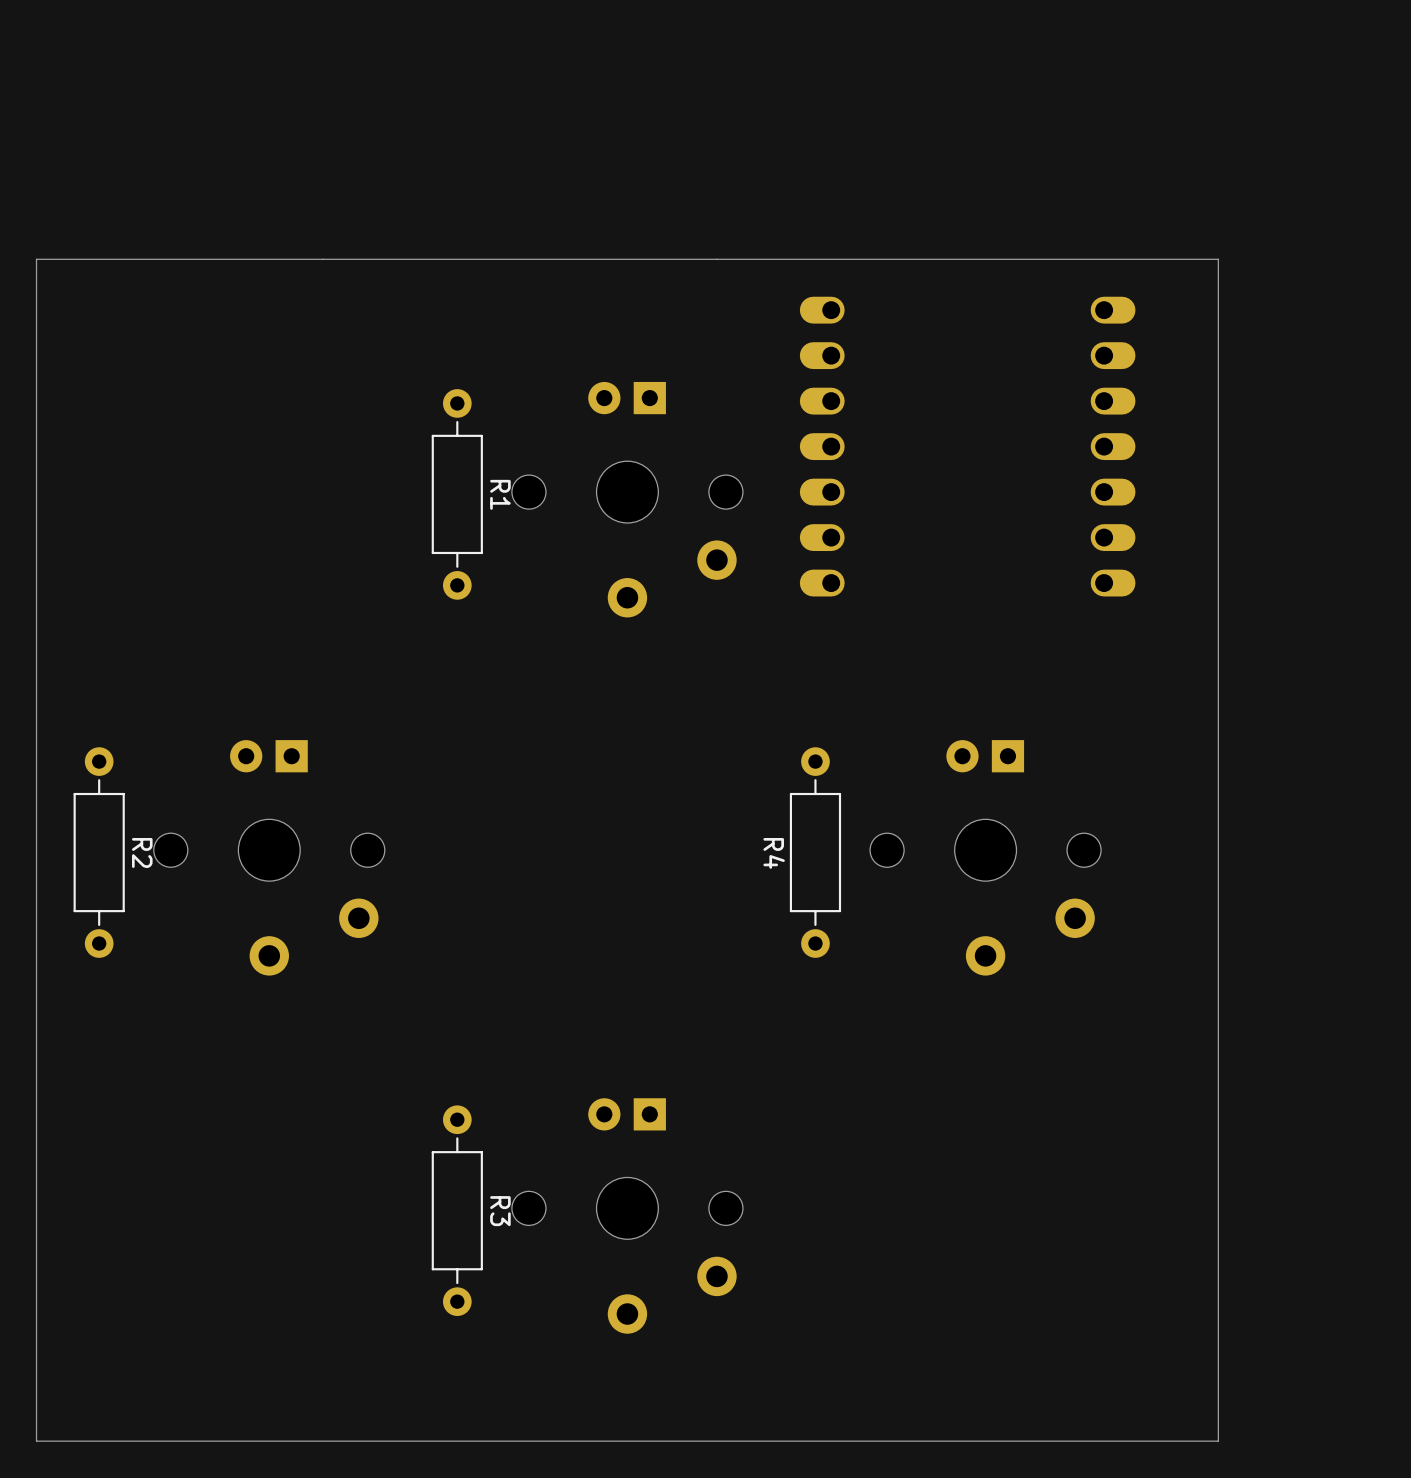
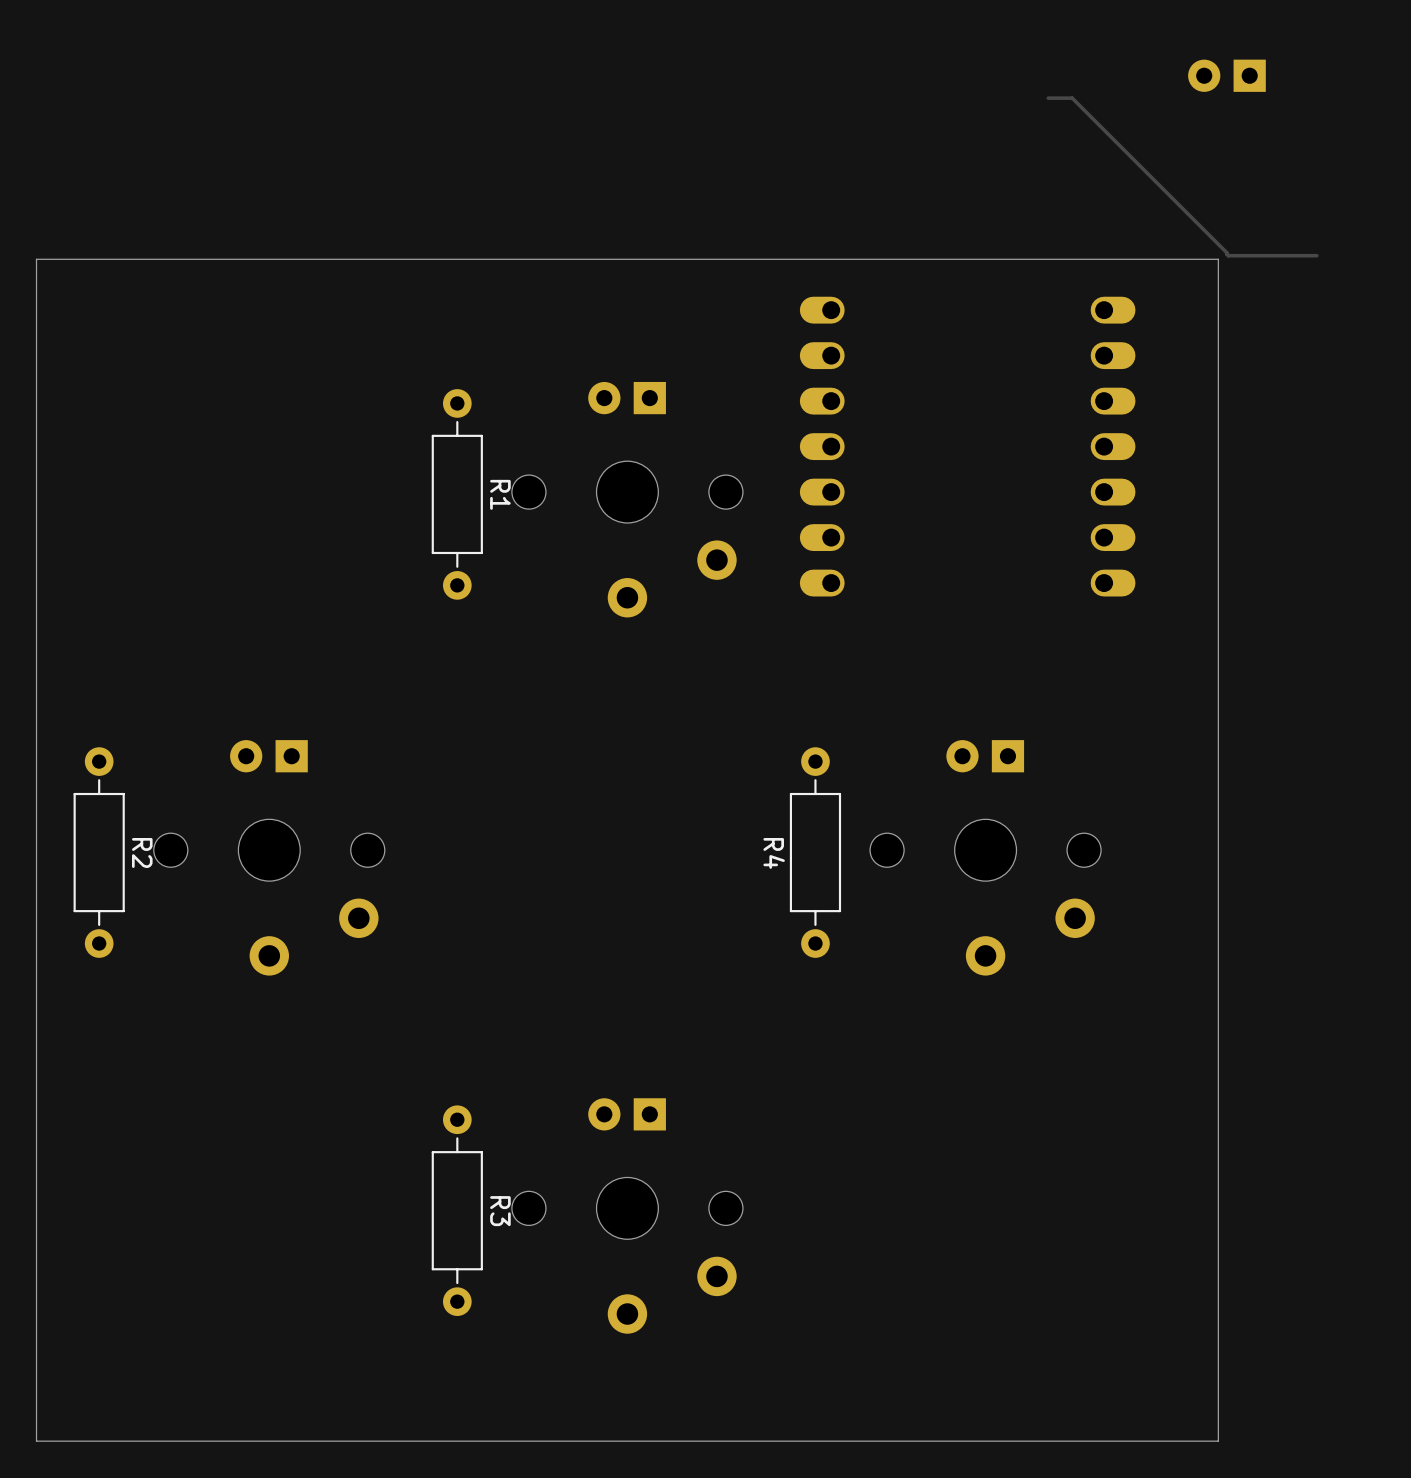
part: none -> (1226, 75)
track: none -> (1048, 98) (1072, 98) (1228, 255) (1316, 255)

